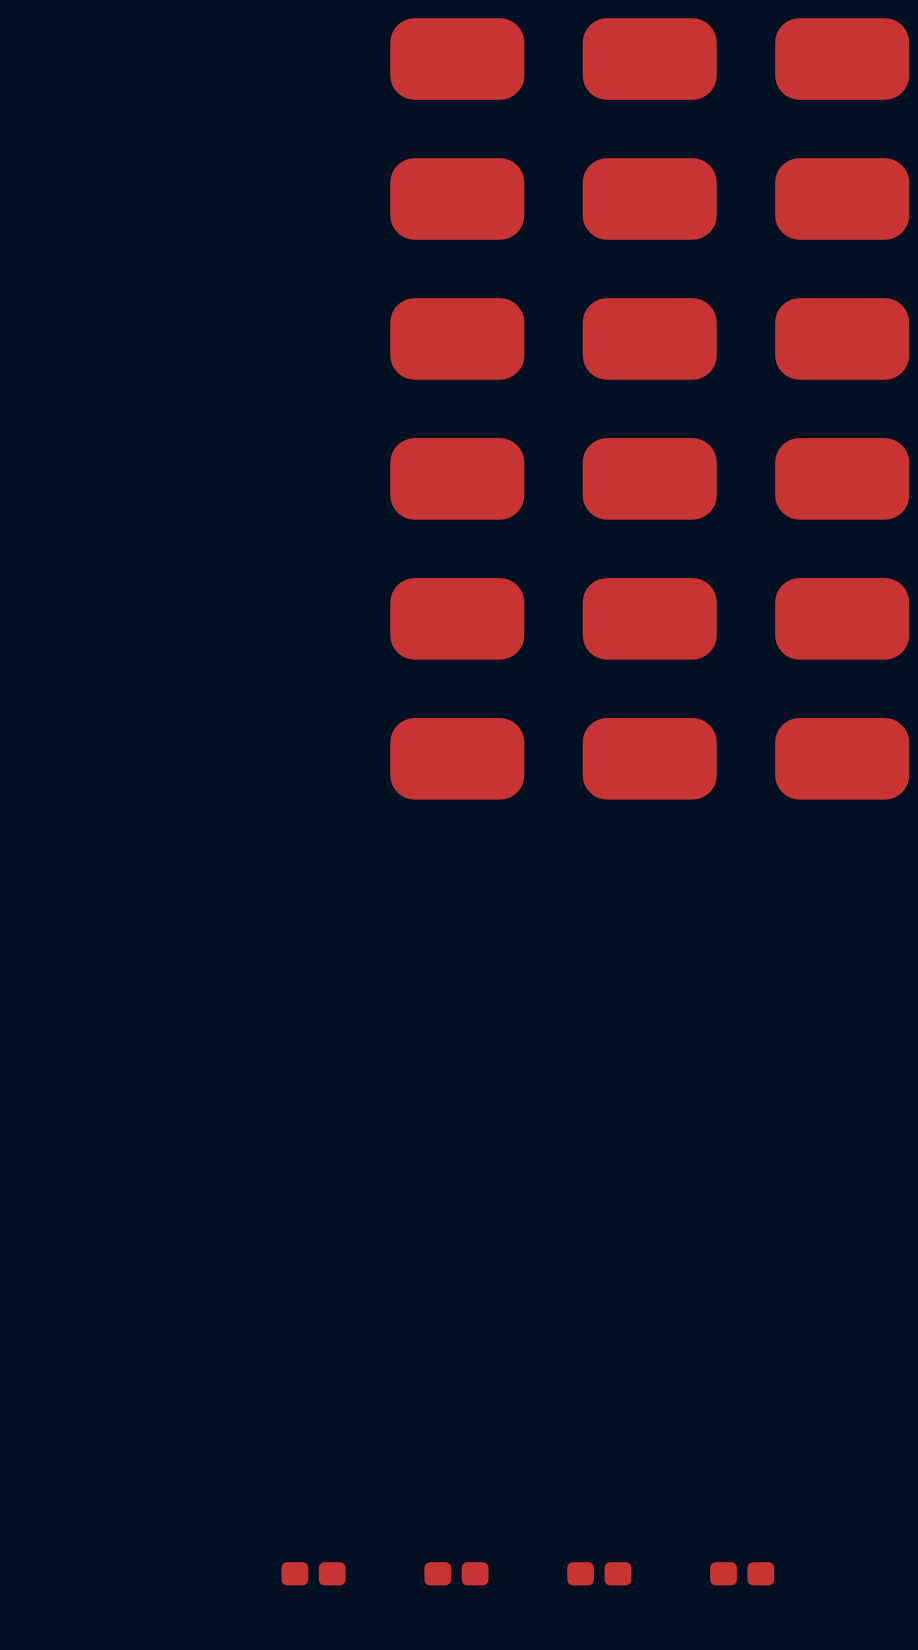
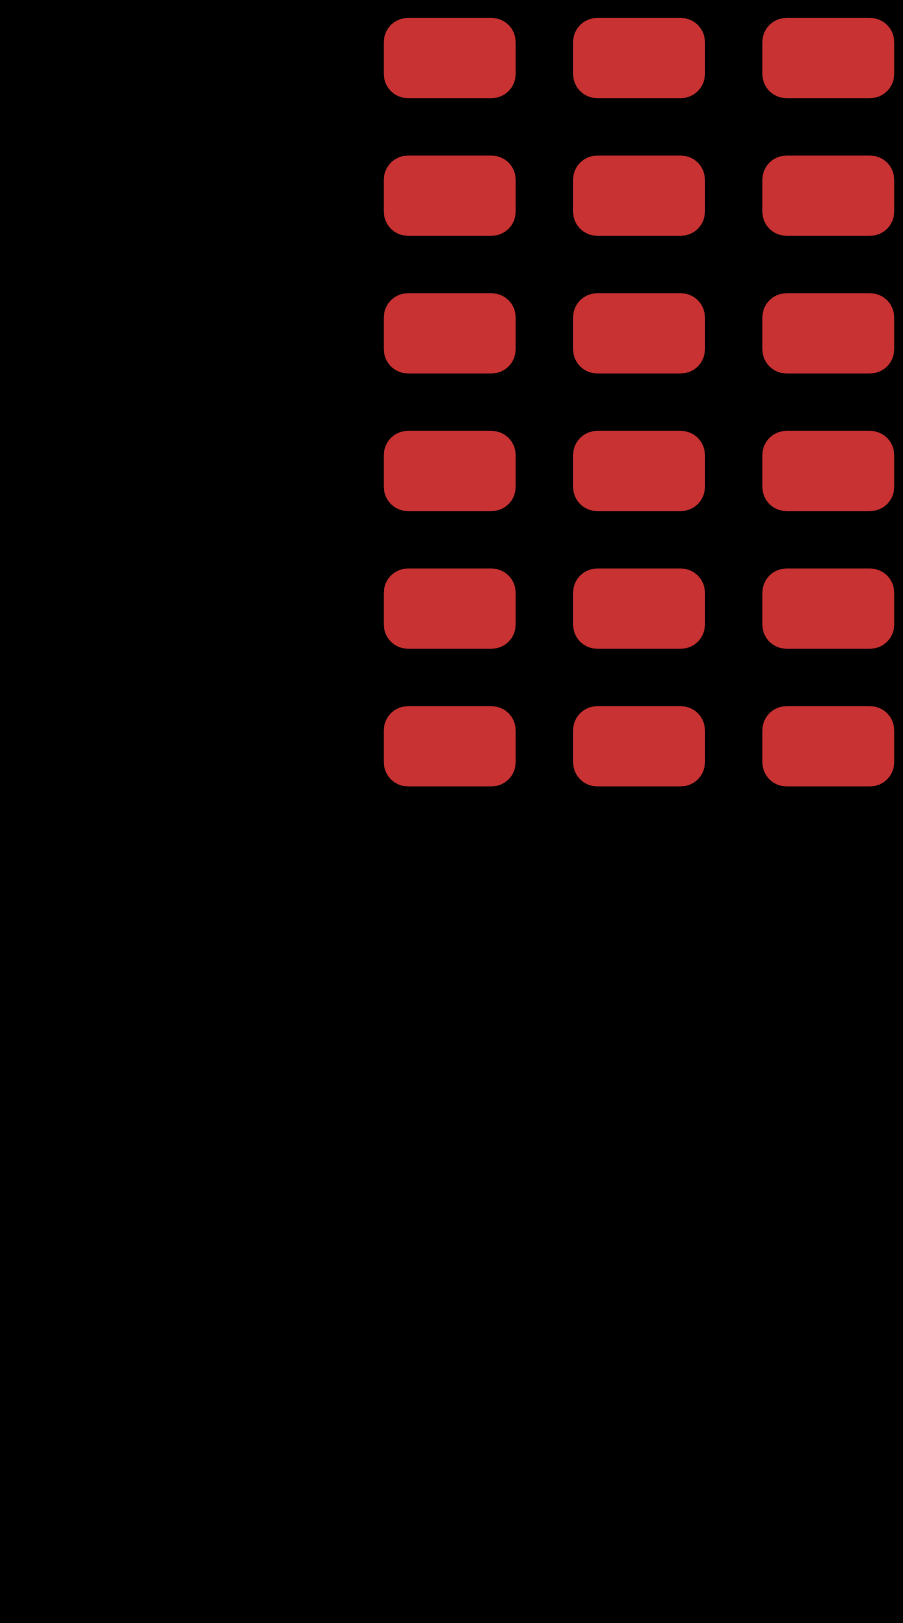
part: (313, 1573) -> none
part: (456, 1573) -> none
part: (599, 1573) -> none
part: (742, 1573) -> none

